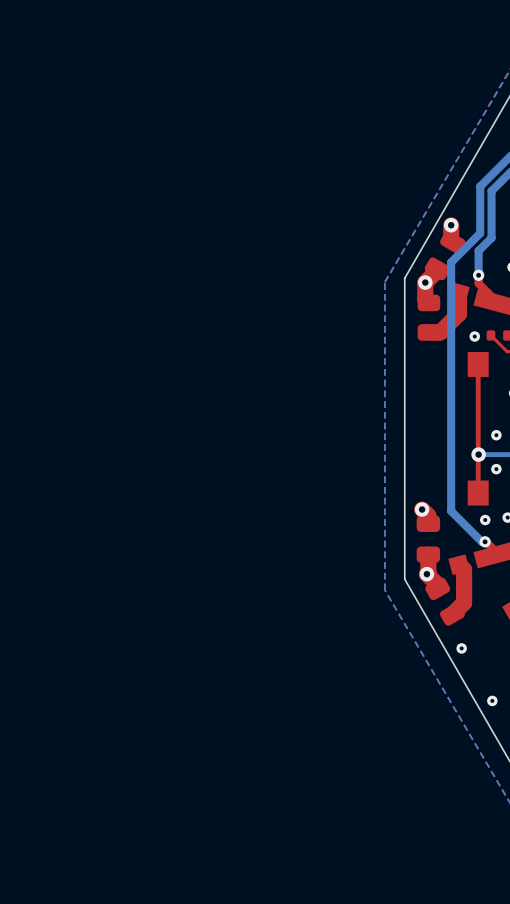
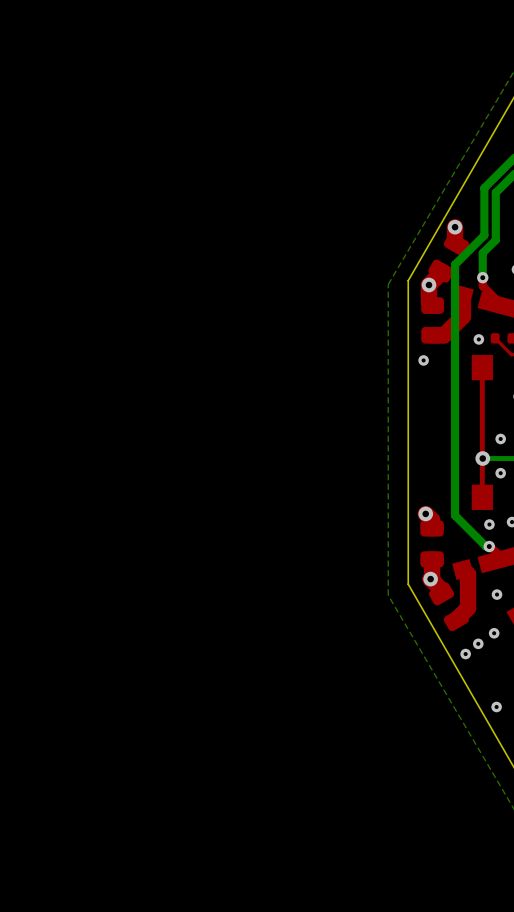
via: none -> (423, 360)
via: none -> (497, 594)
via: none -> (494, 633)
via: none -> (478, 643)

